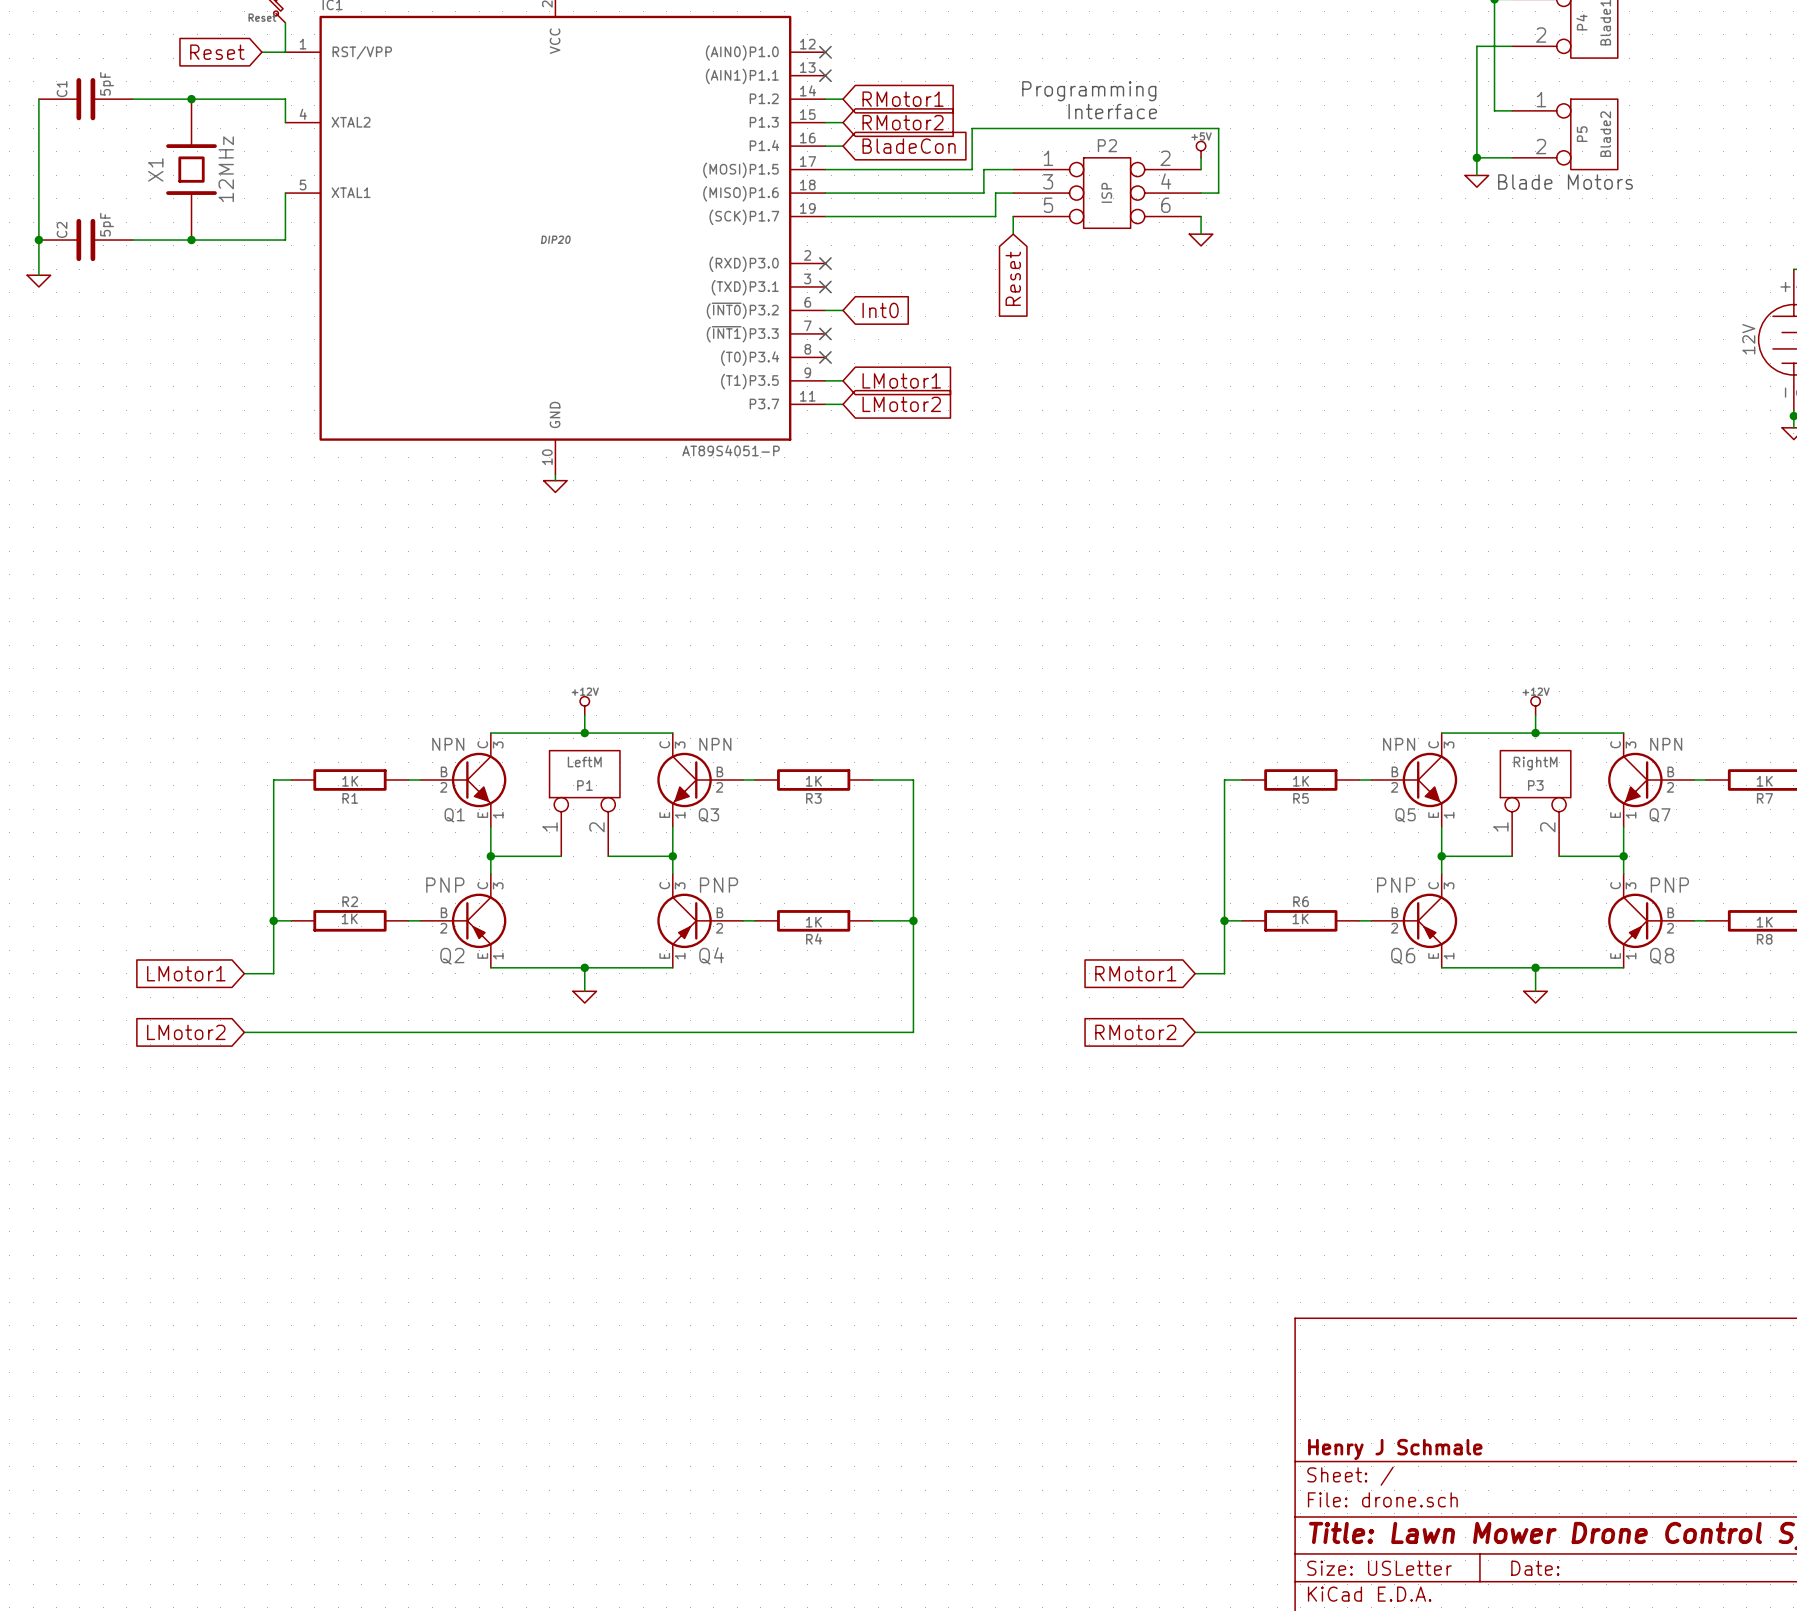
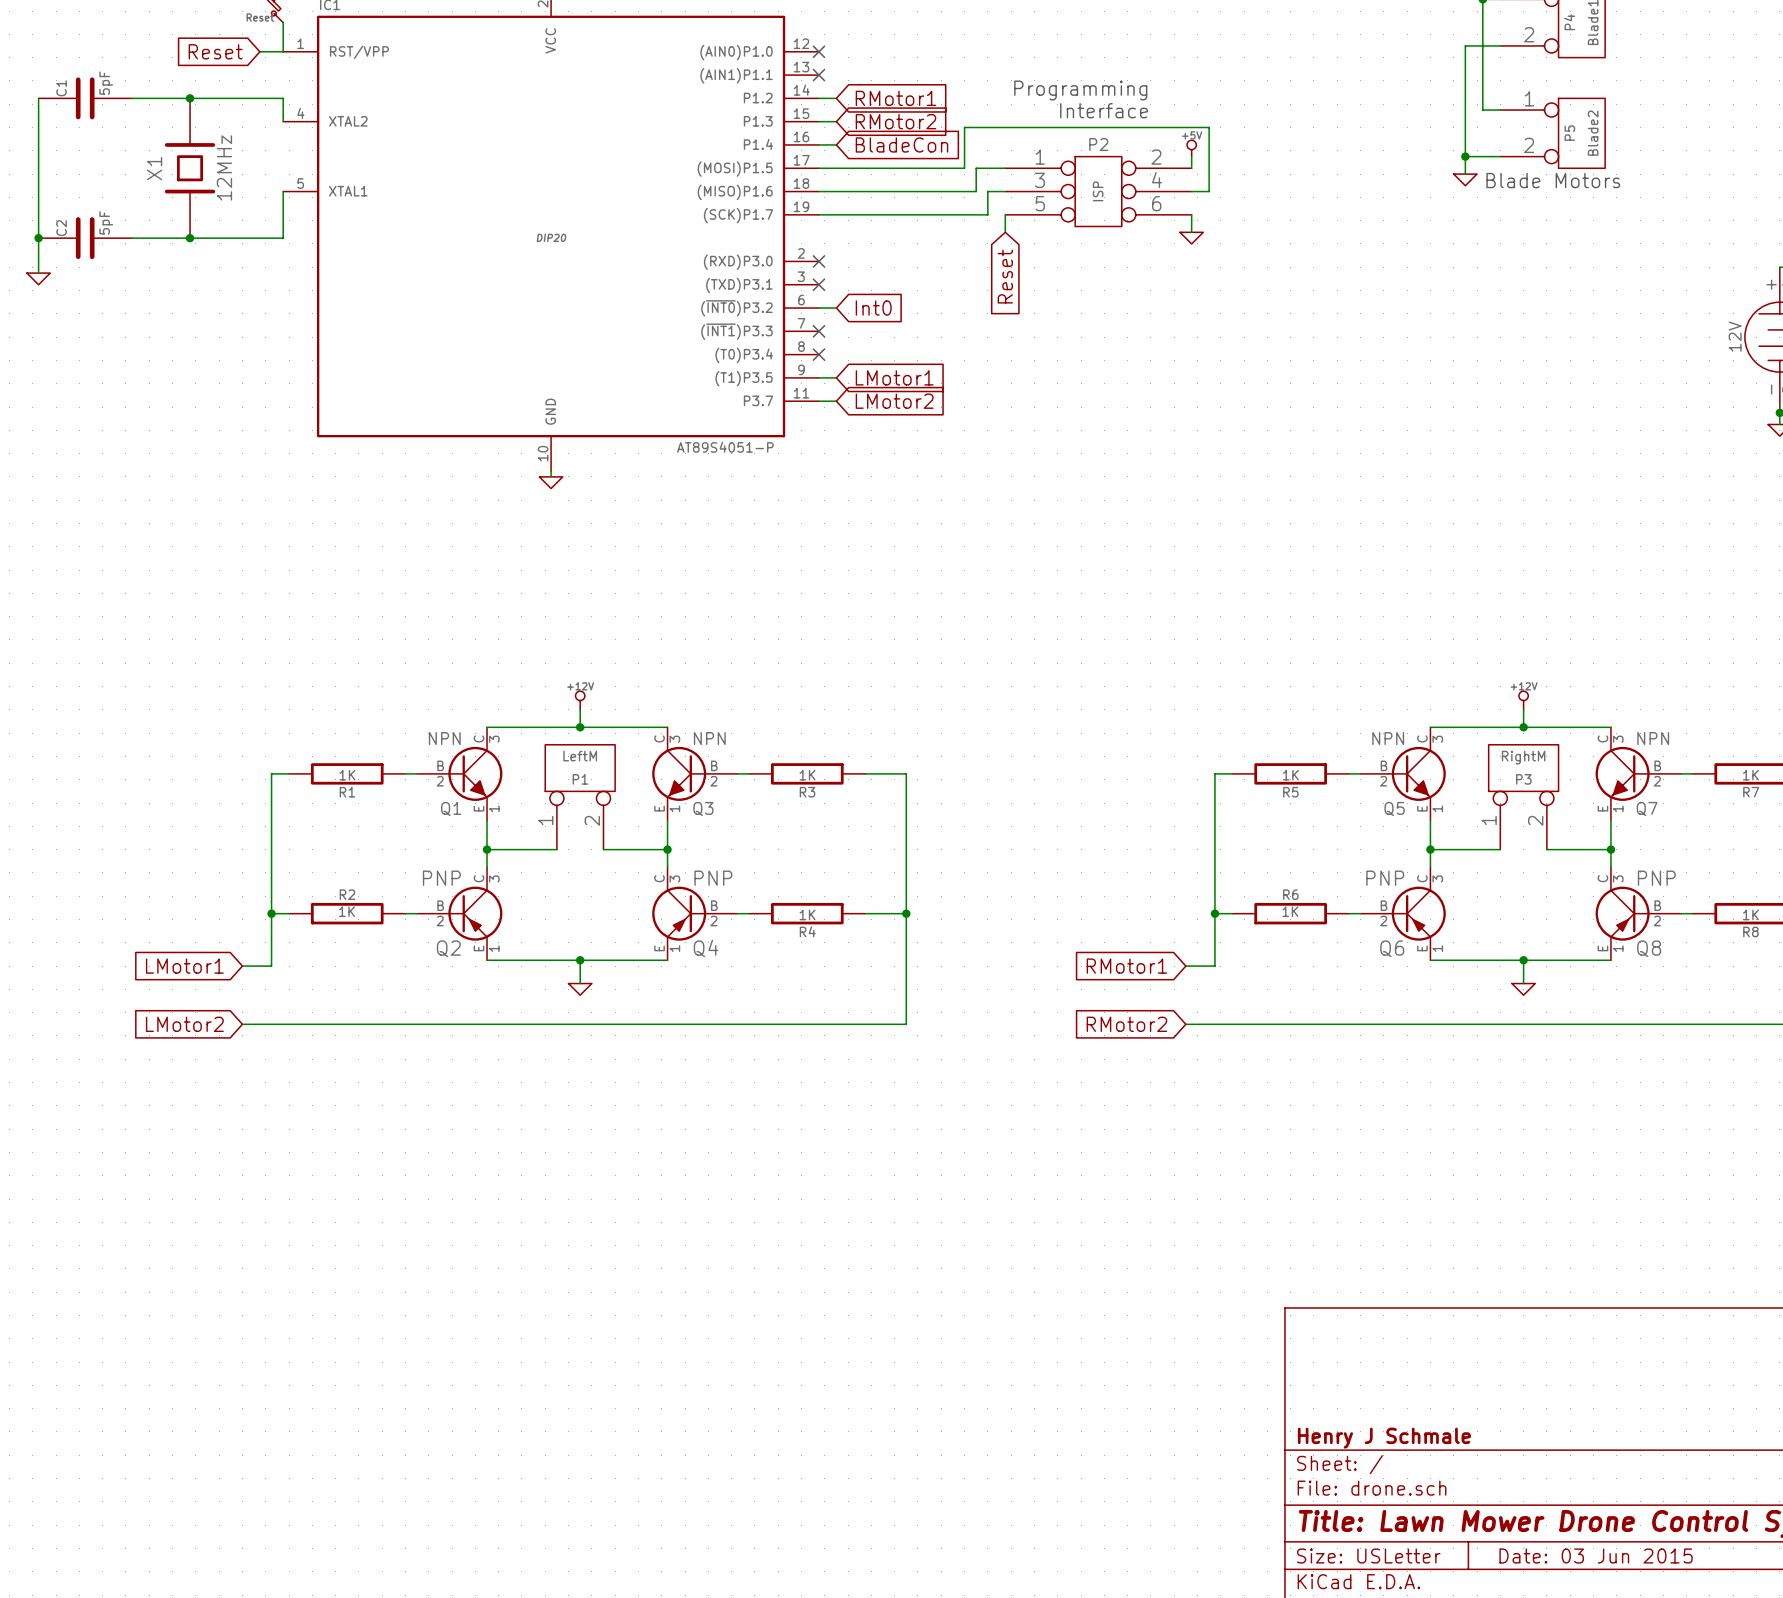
title block: Date: (1535, 1568) -> Date: 03 Jun 2015 (1596, 1555)

